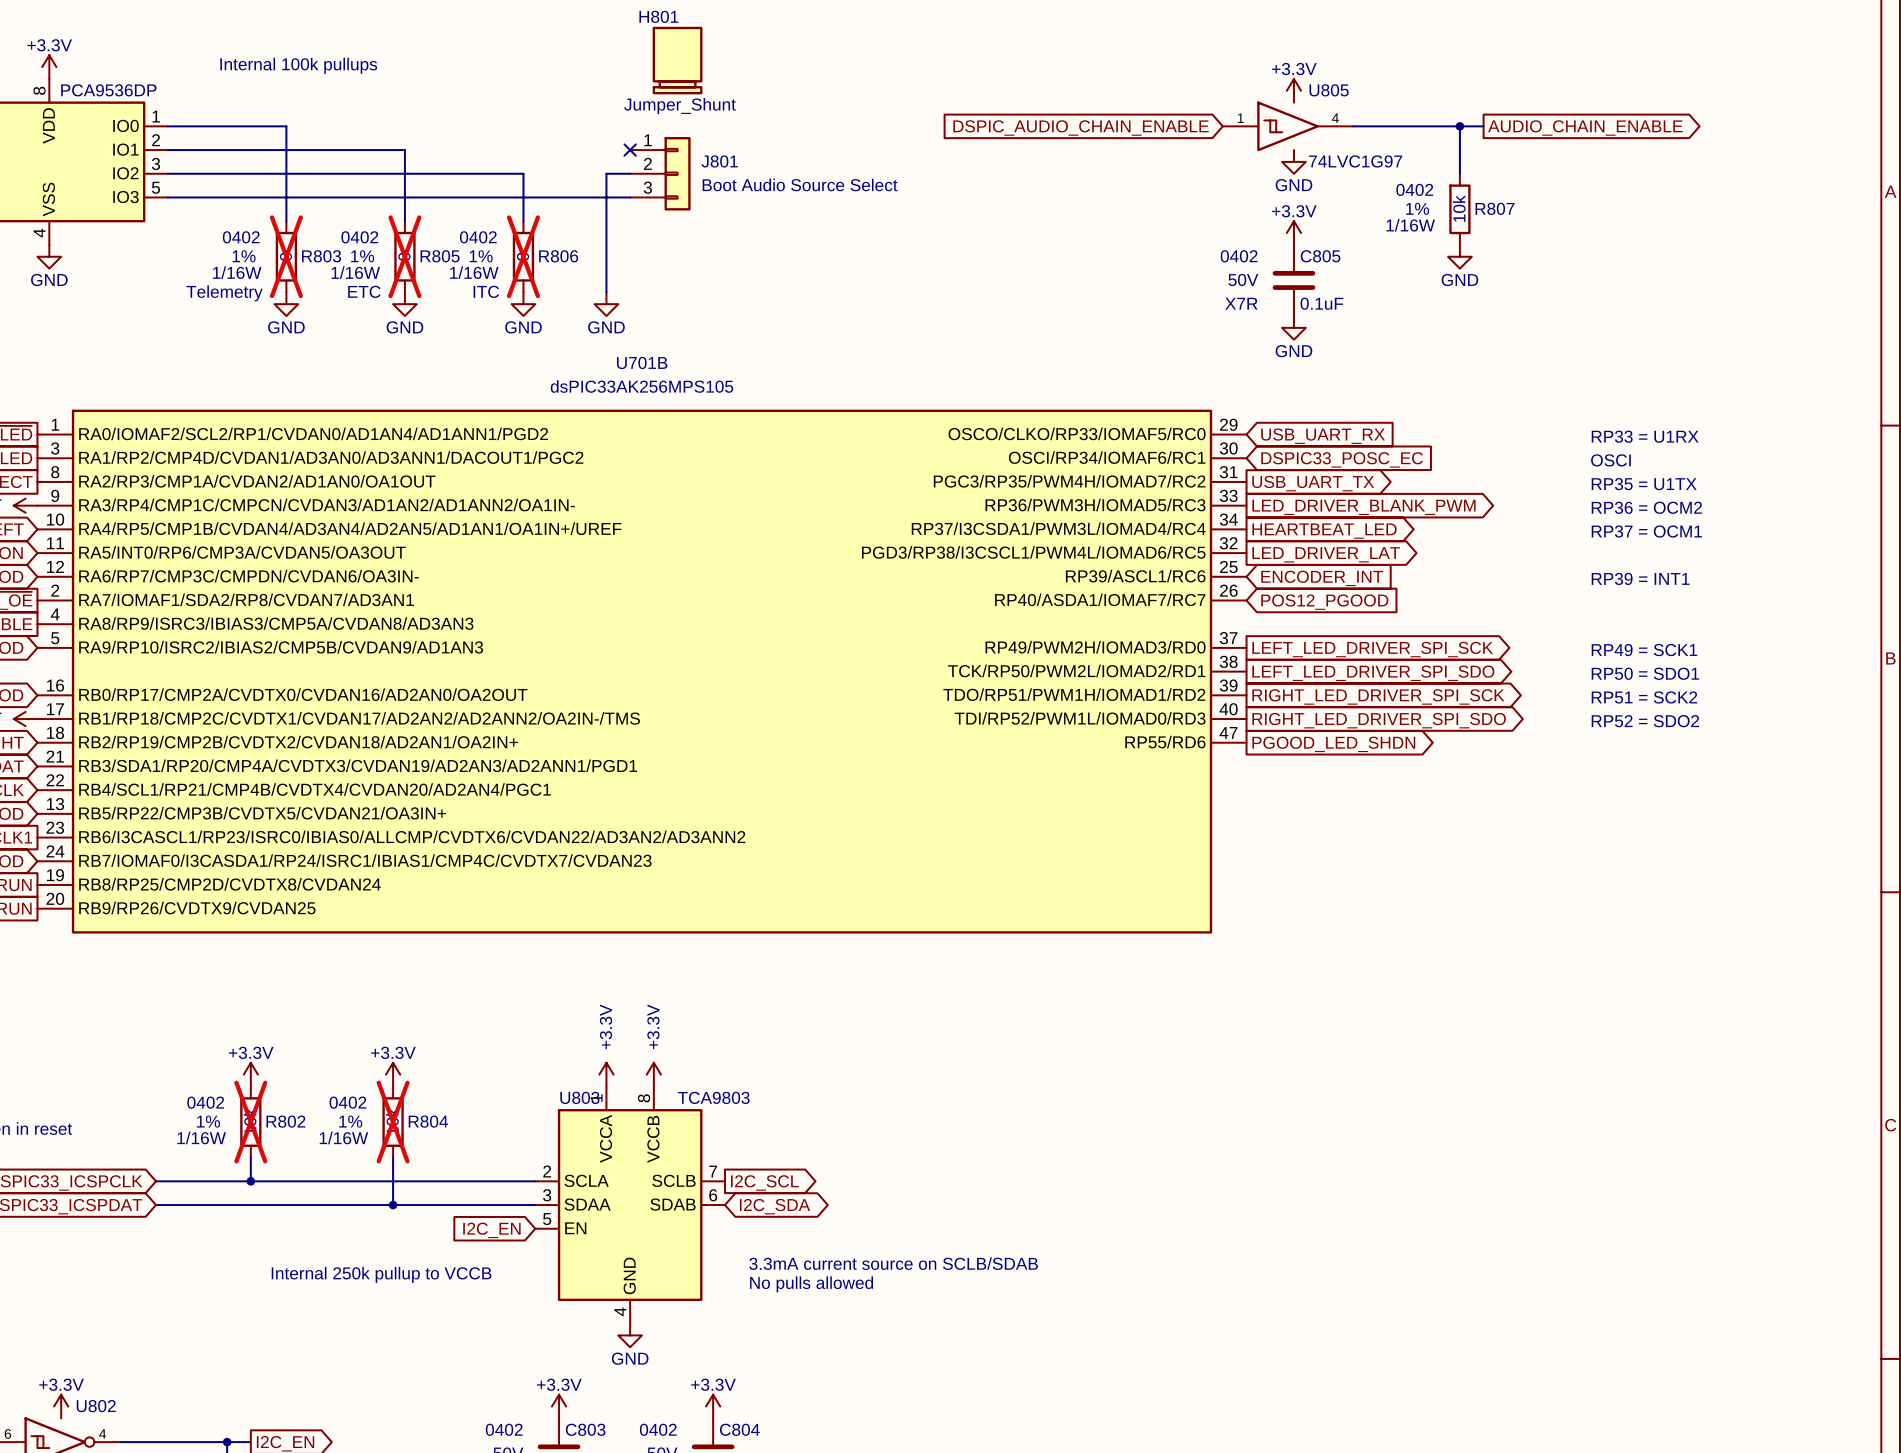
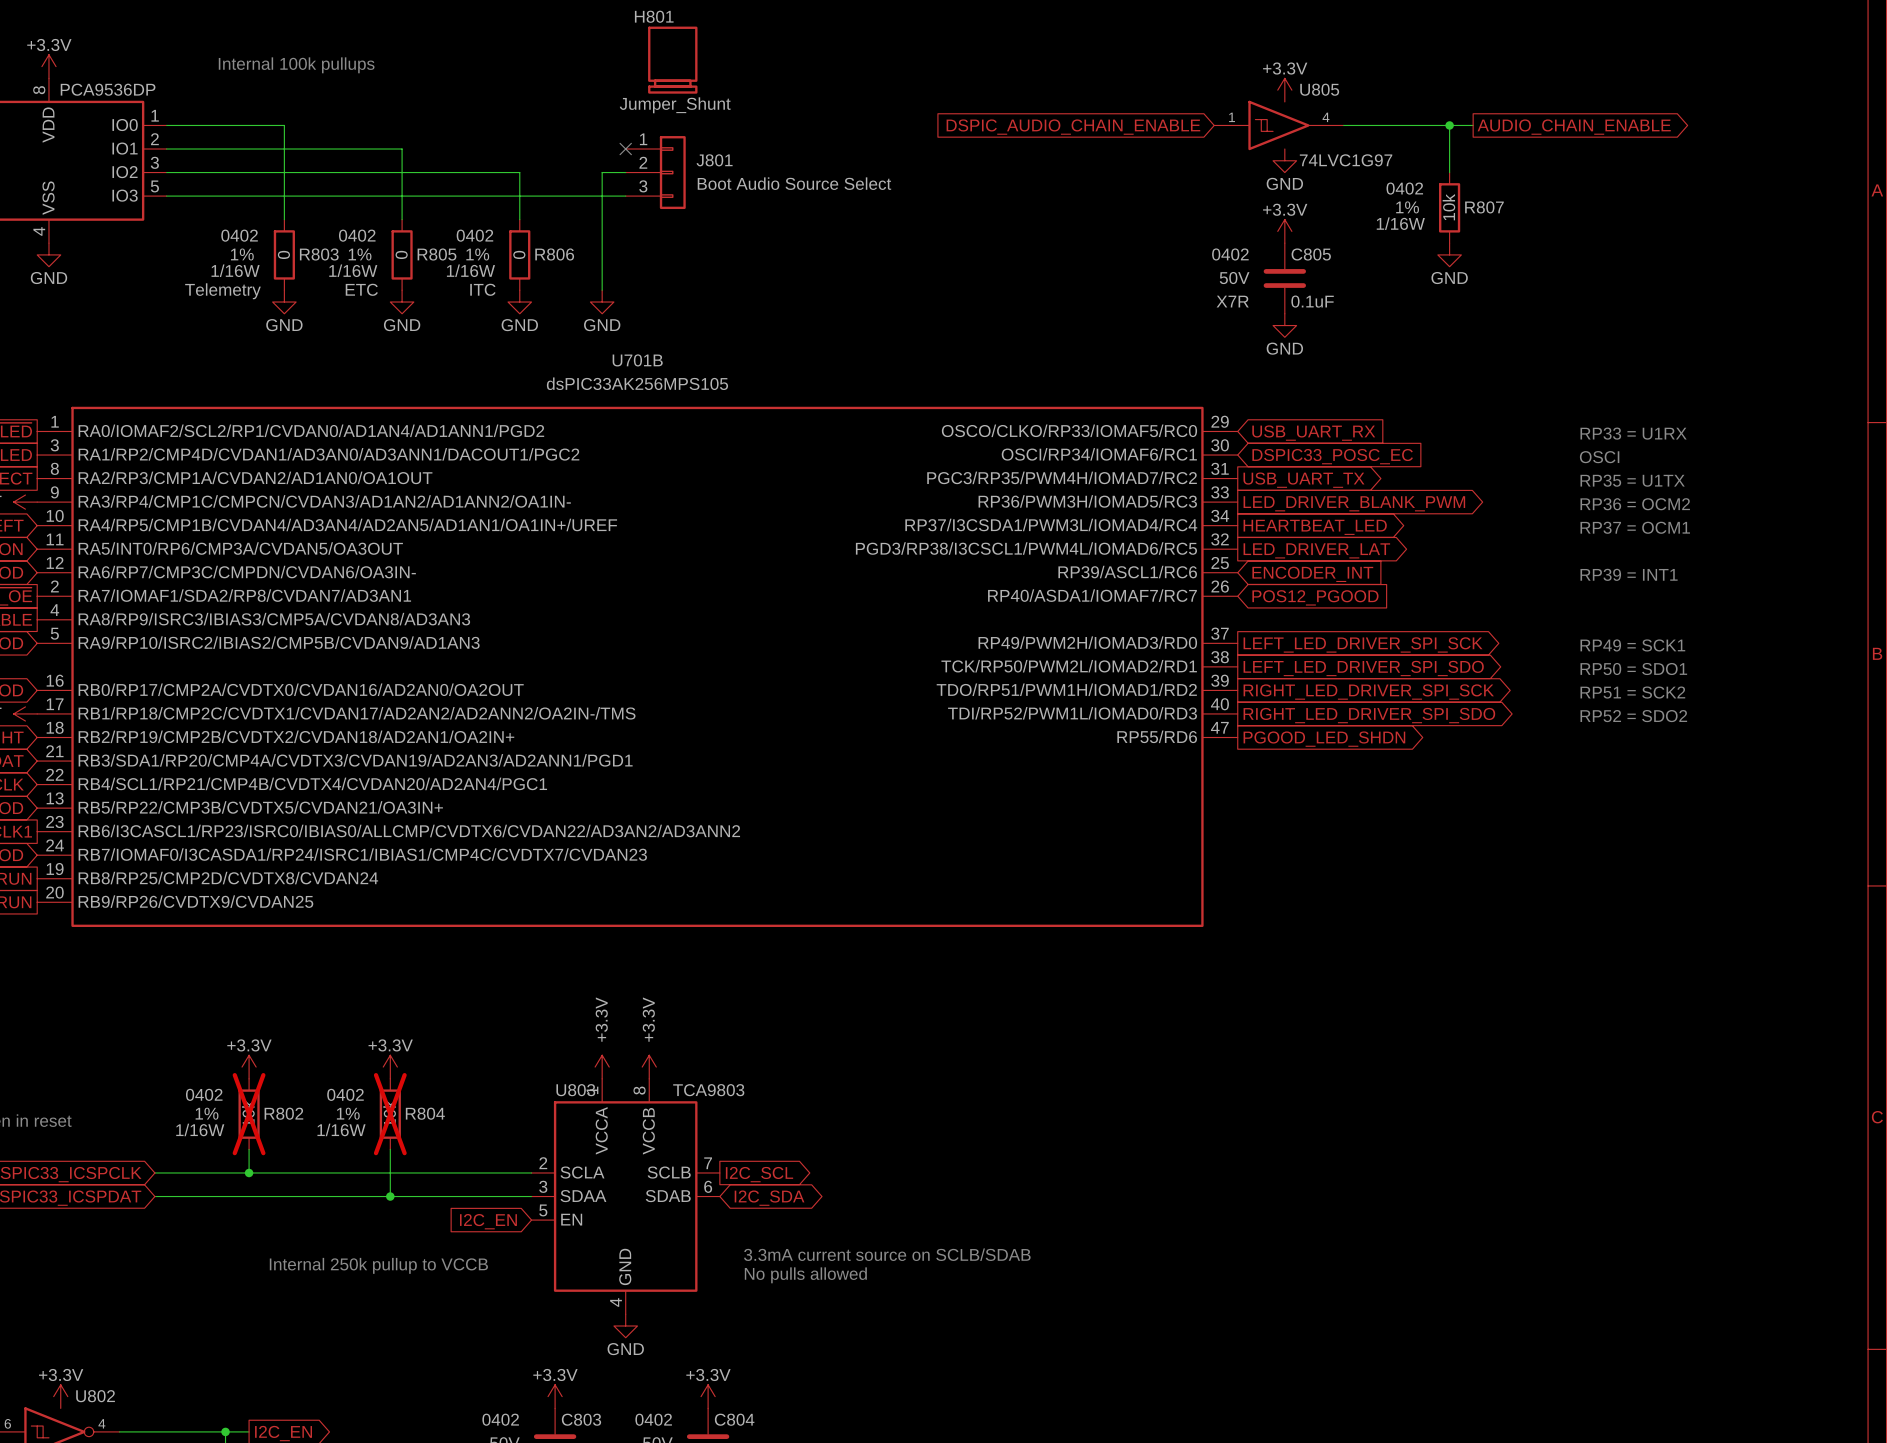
R803 do-not-place cross: (286, 256) -> none
R805 do-not-place cross: (404, 256) -> none
R806 do-not-place cross: (523, 256) -> none

